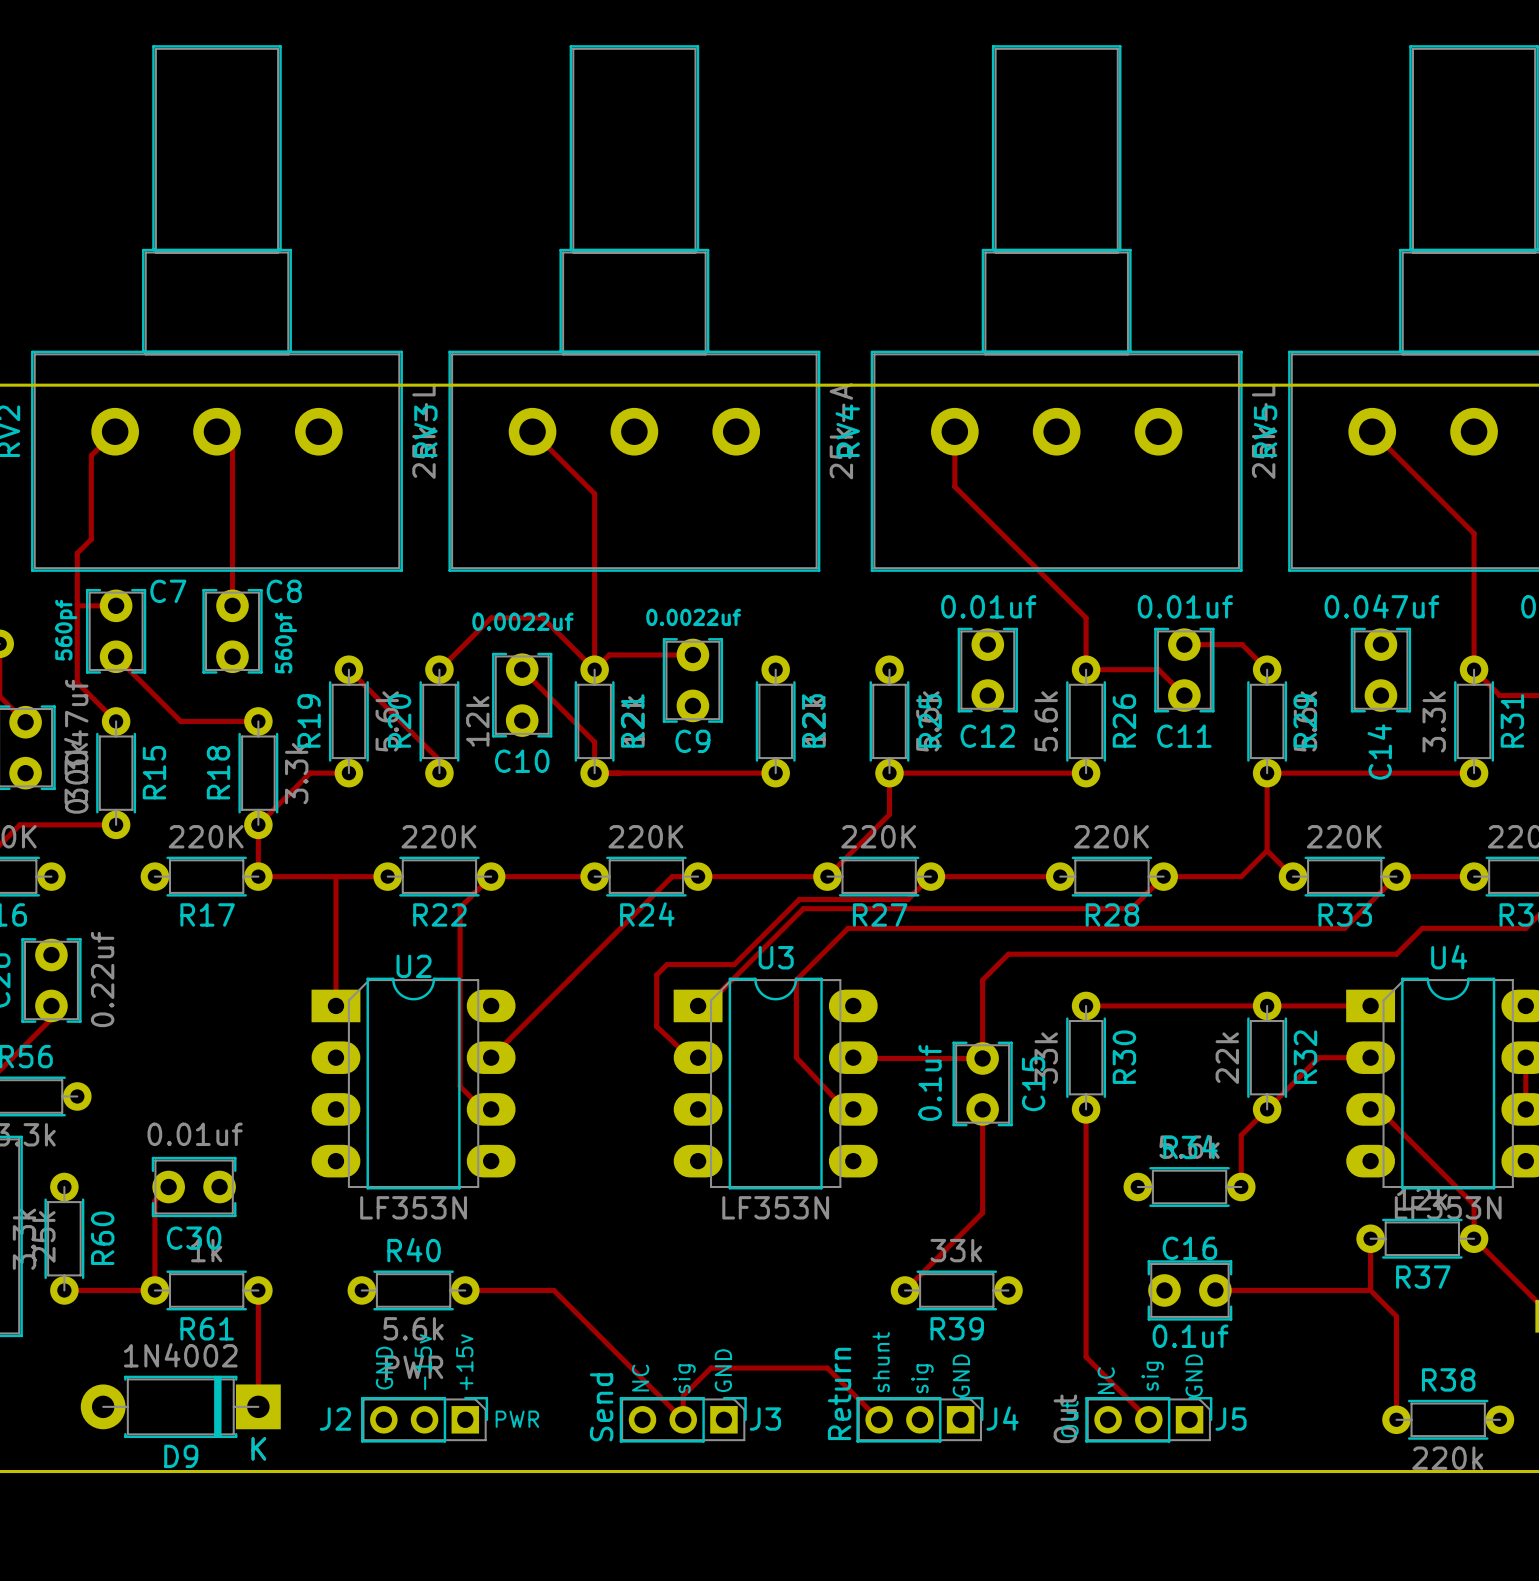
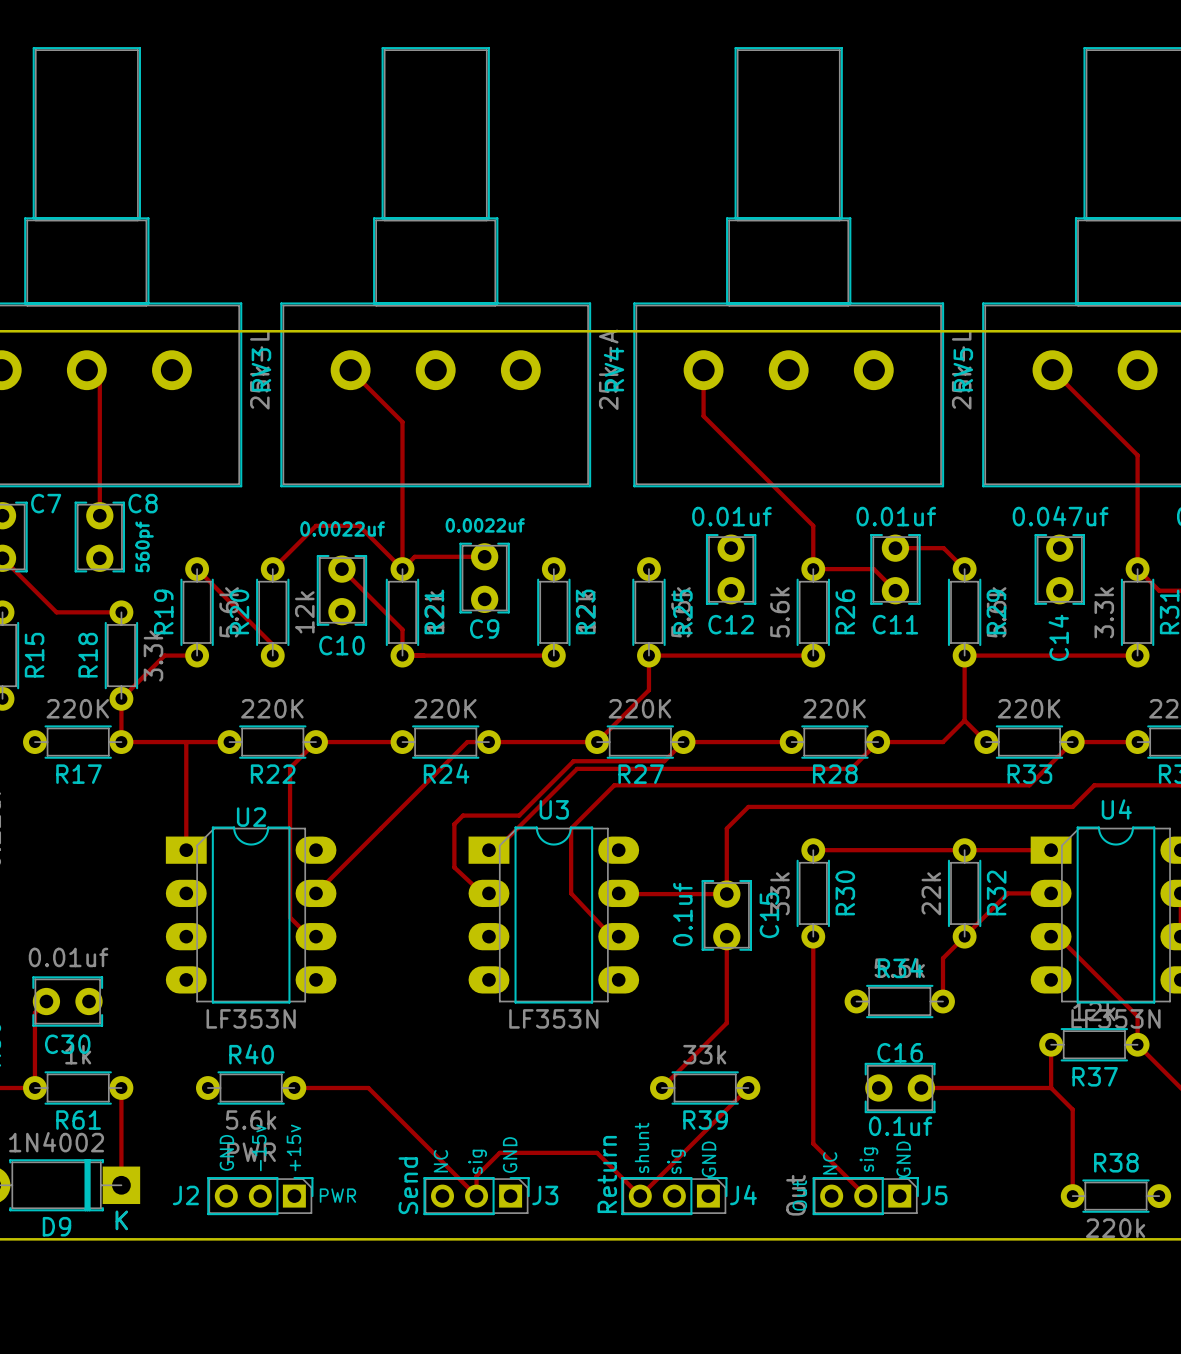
track: none -> (748, 1087) (640, 1196)

